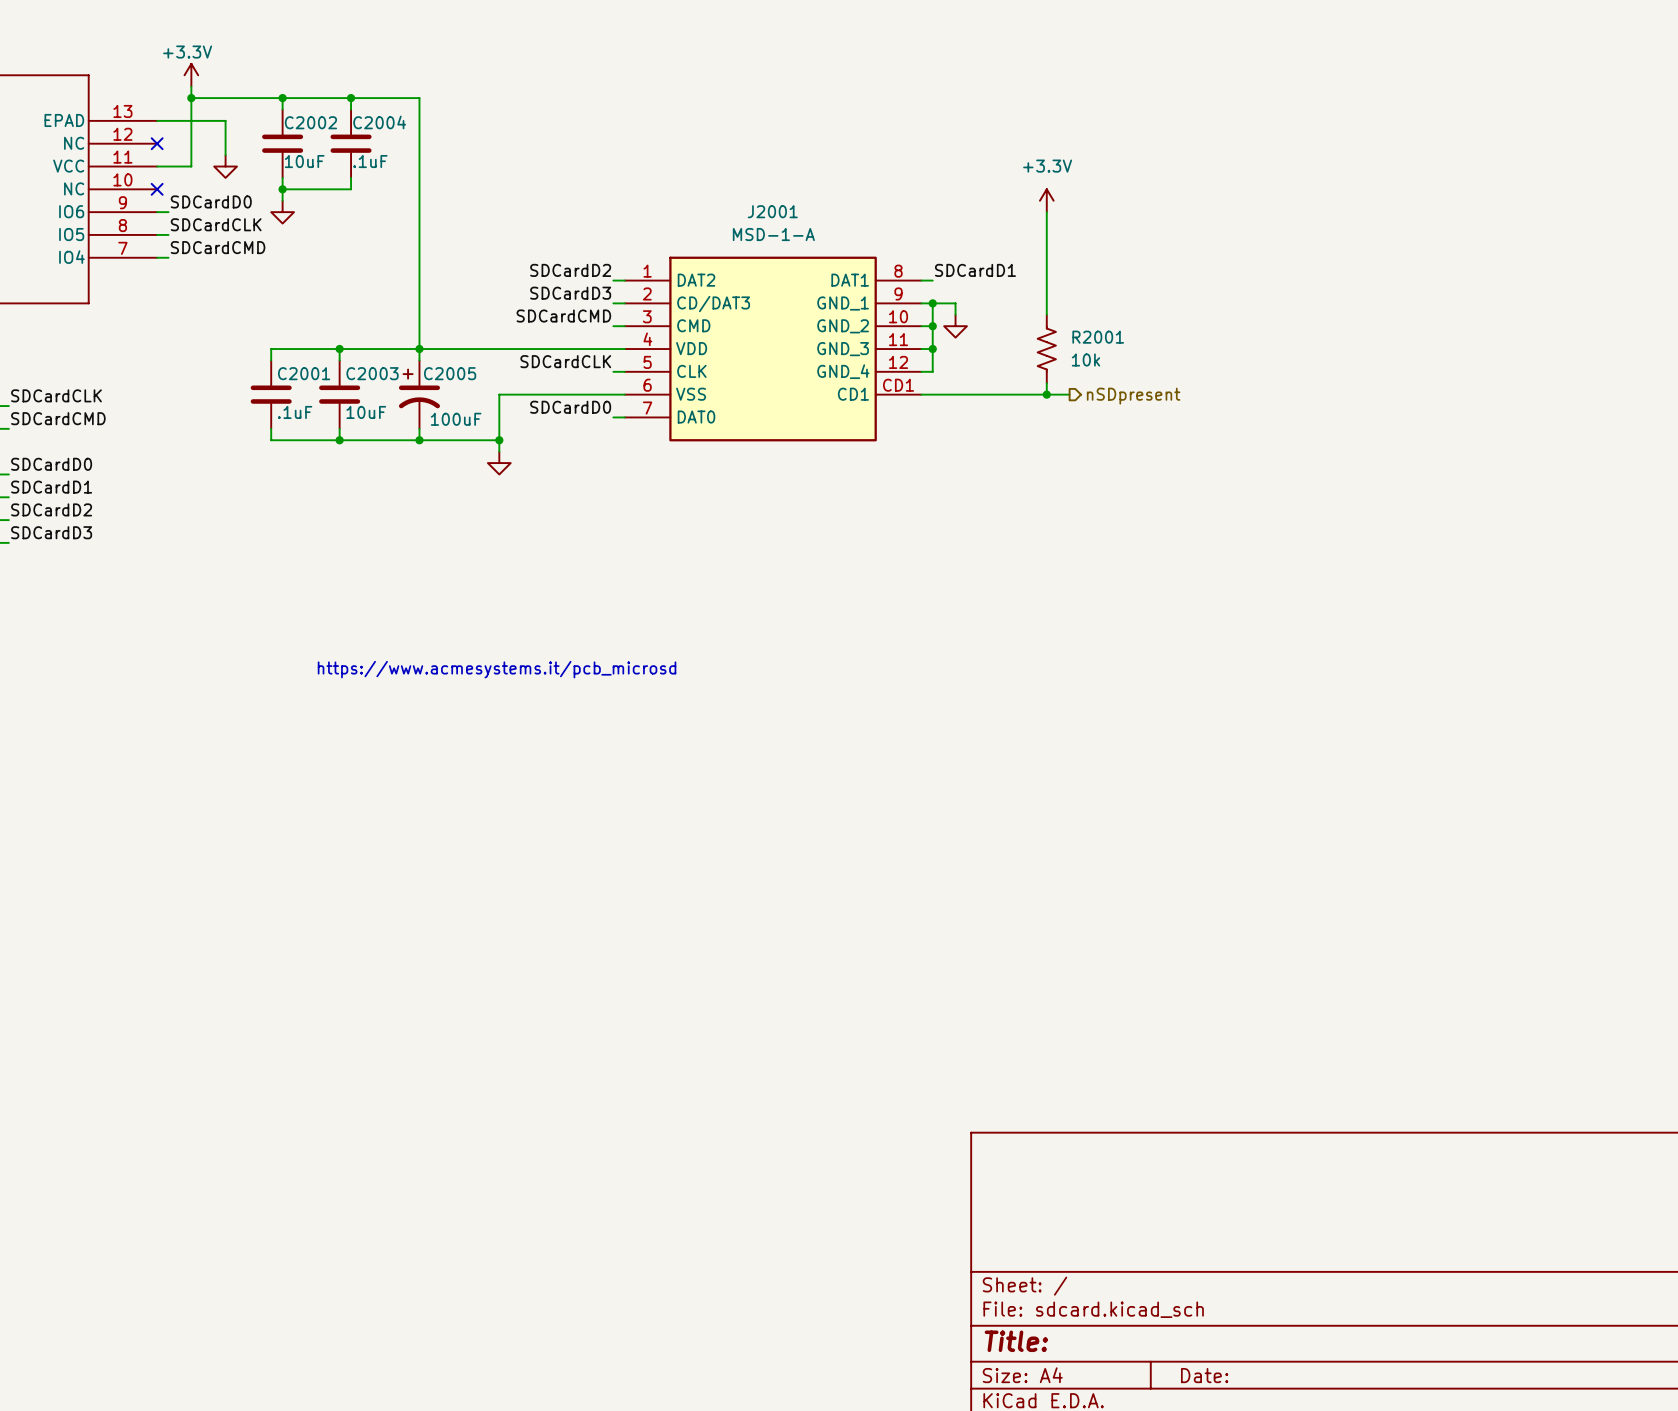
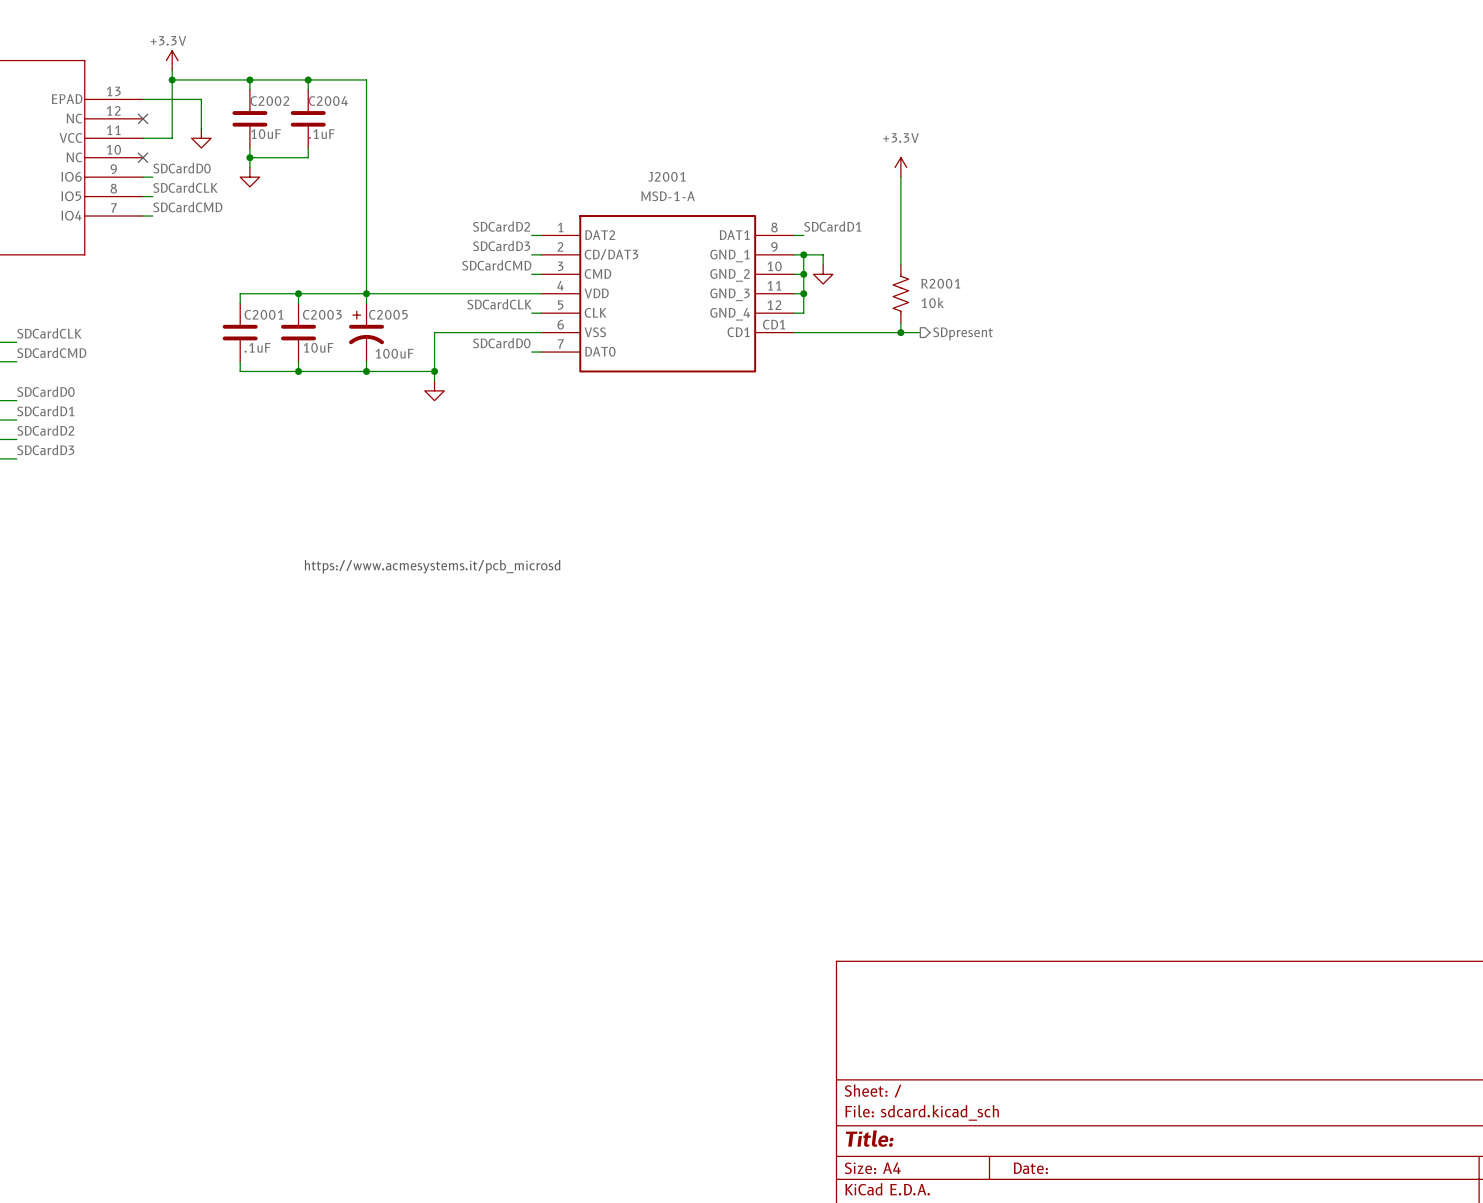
hierarchical label: nSDpresent (1133, 396) -> SDpresent (963, 333)

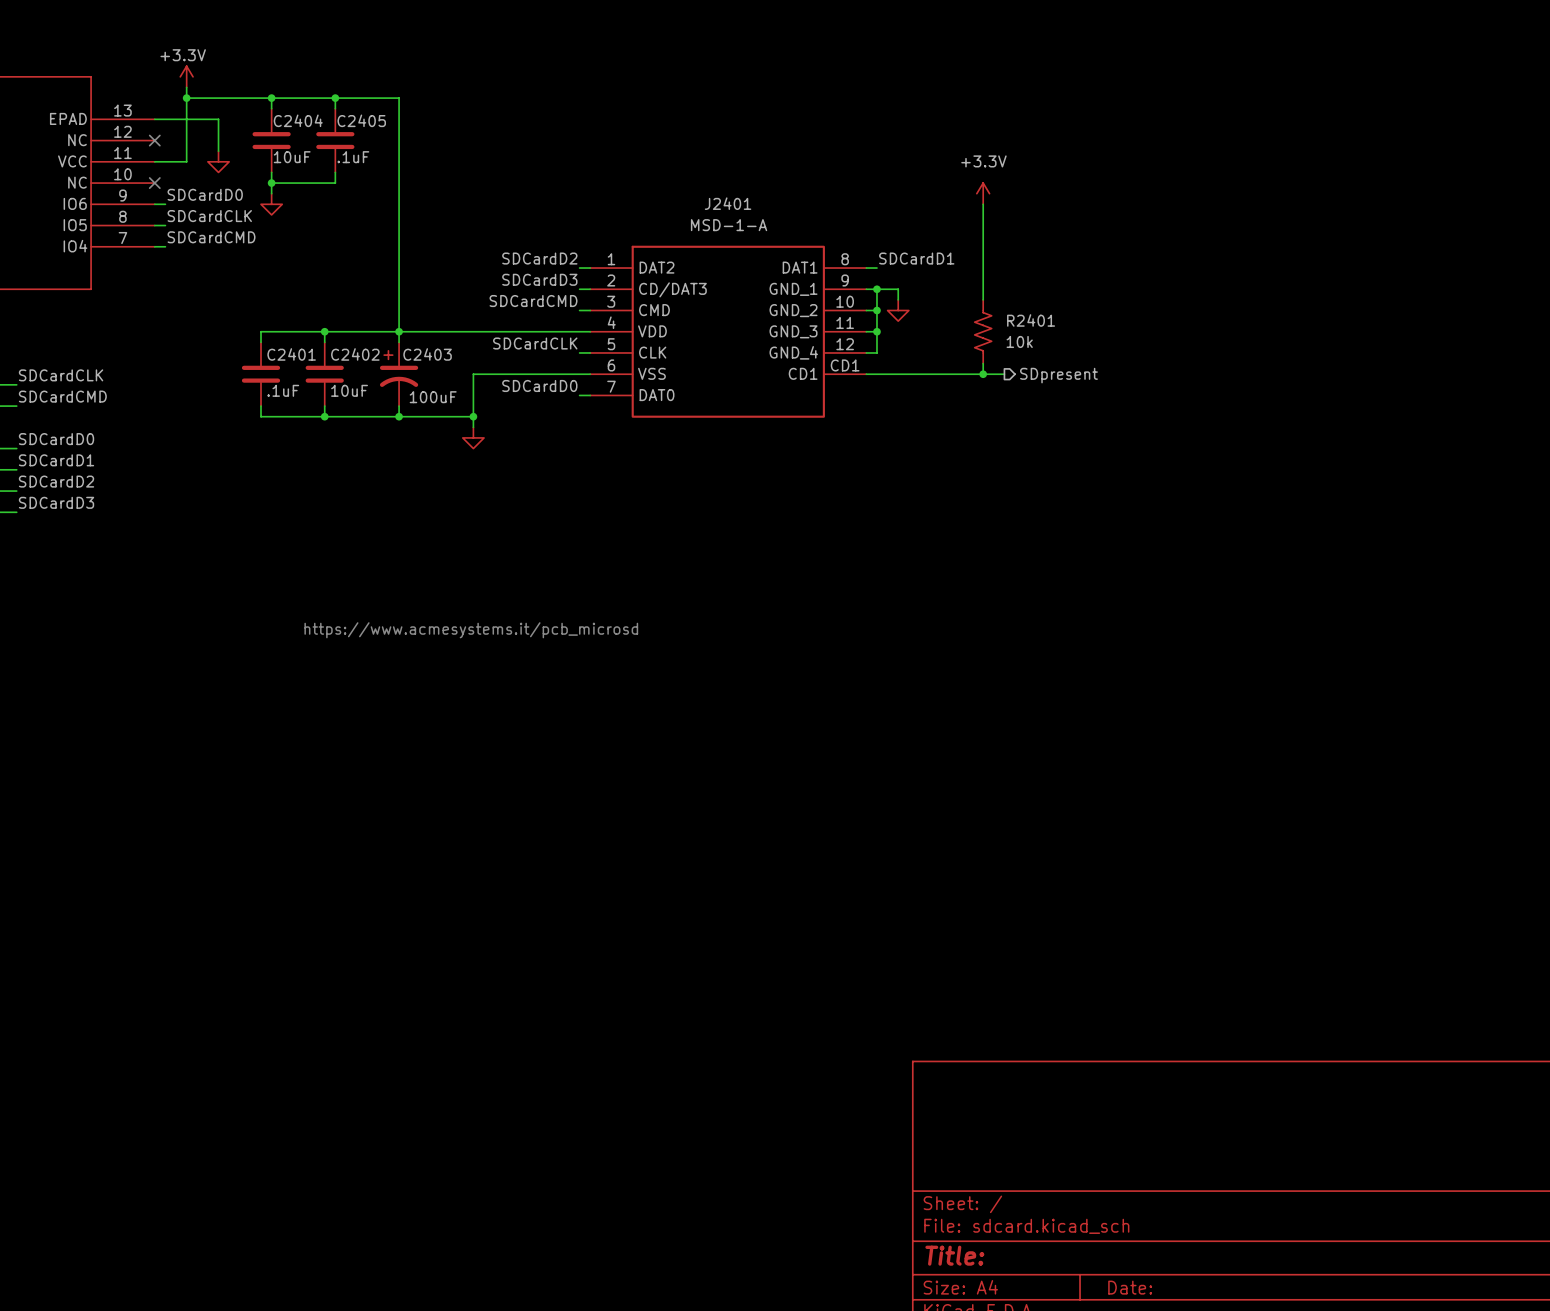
C2002 name: C2002 (269, 101) -> C2404 (298, 120)
C2004 name: C2004 (328, 101) -> C2405 (361, 120)
J2001 name: J2001 (666, 176) -> J2401 (728, 203)
R2001 name: R2001 (940, 283) -> R2401 (1031, 320)
C2001 name: C2001 (264, 314) -> C2401 (291, 354)
C2003 name: C2003 (322, 314) -> C2402 (355, 354)
C2005 name: C2005 (388, 314) -> C2403 (427, 354)

